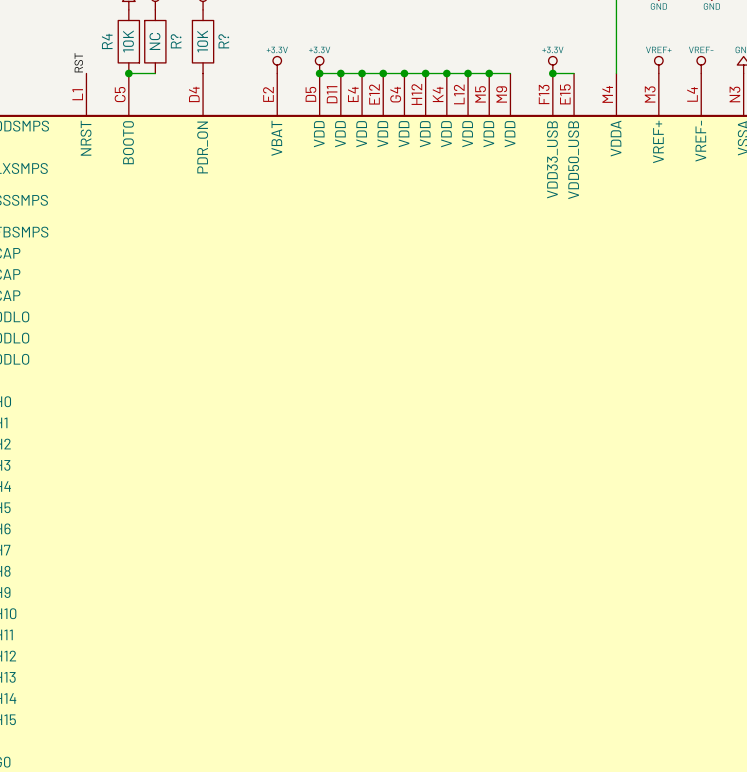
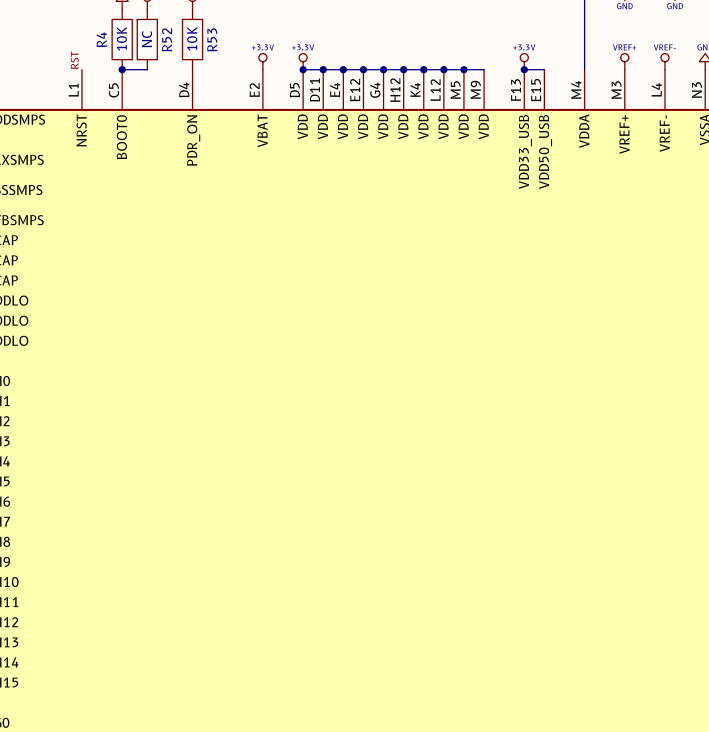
R? name: R? (176, 41) -> R52 (167, 39)
R? name: R? (223, 41) -> R53 (212, 39)

